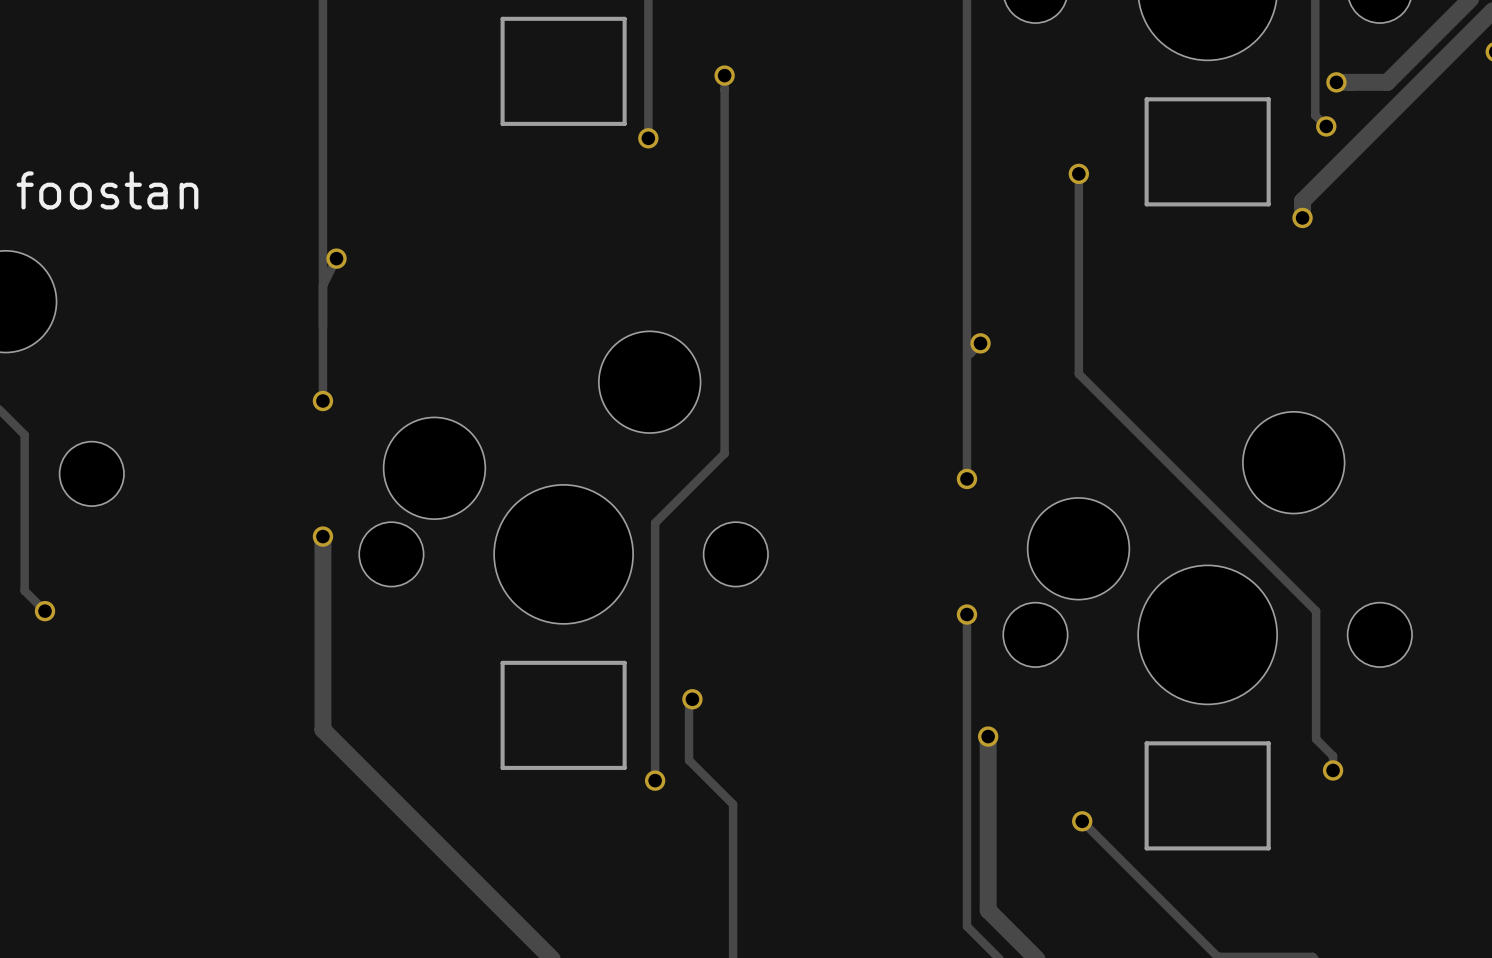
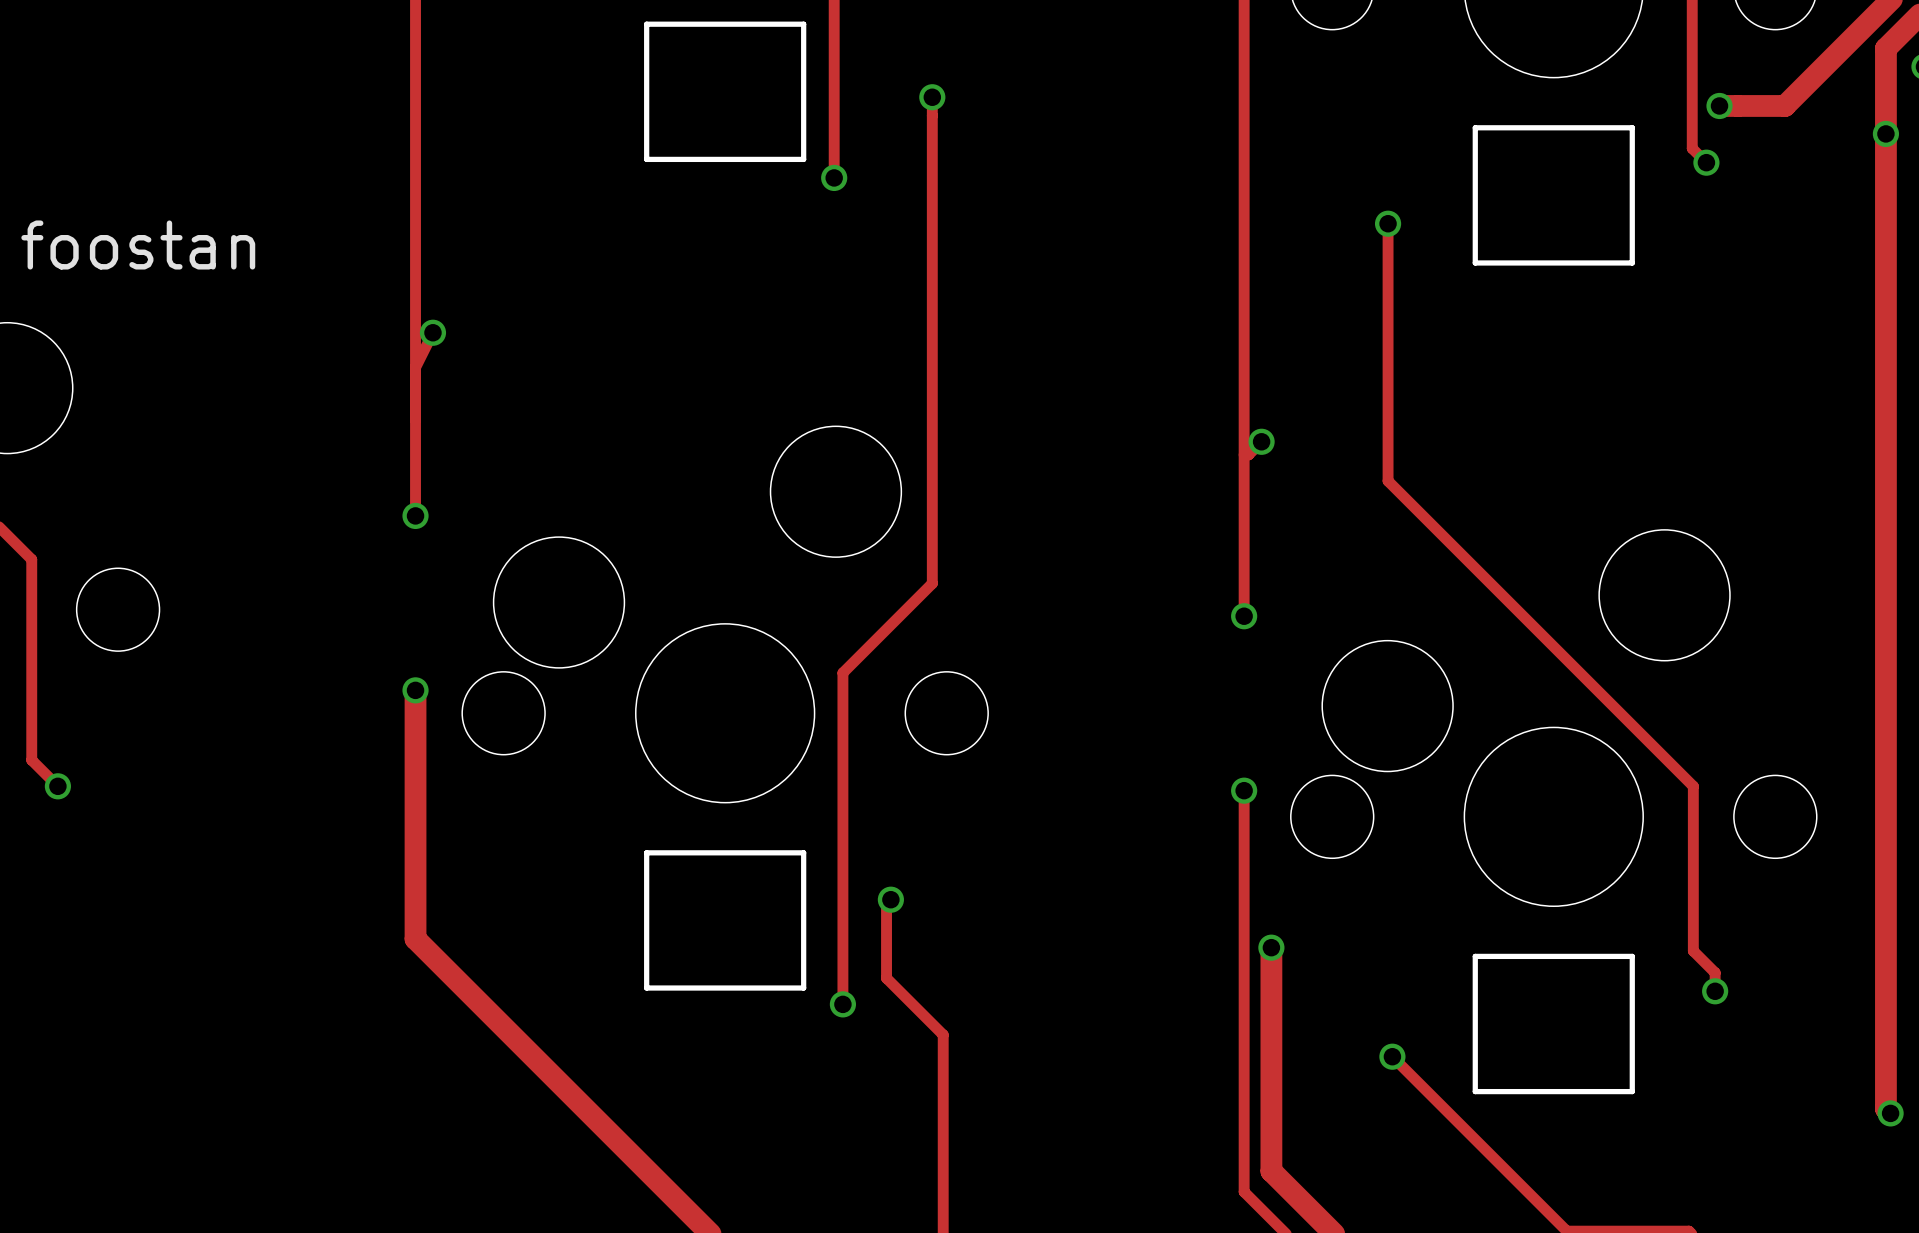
track: (1465, 37) (1302, 201) (1302, 217) -> (1885, 48) (1885, 1108) (1890, 1113)
via position: (1302, 217) -> (1885, 133)
via: none -> (1890, 1113)

